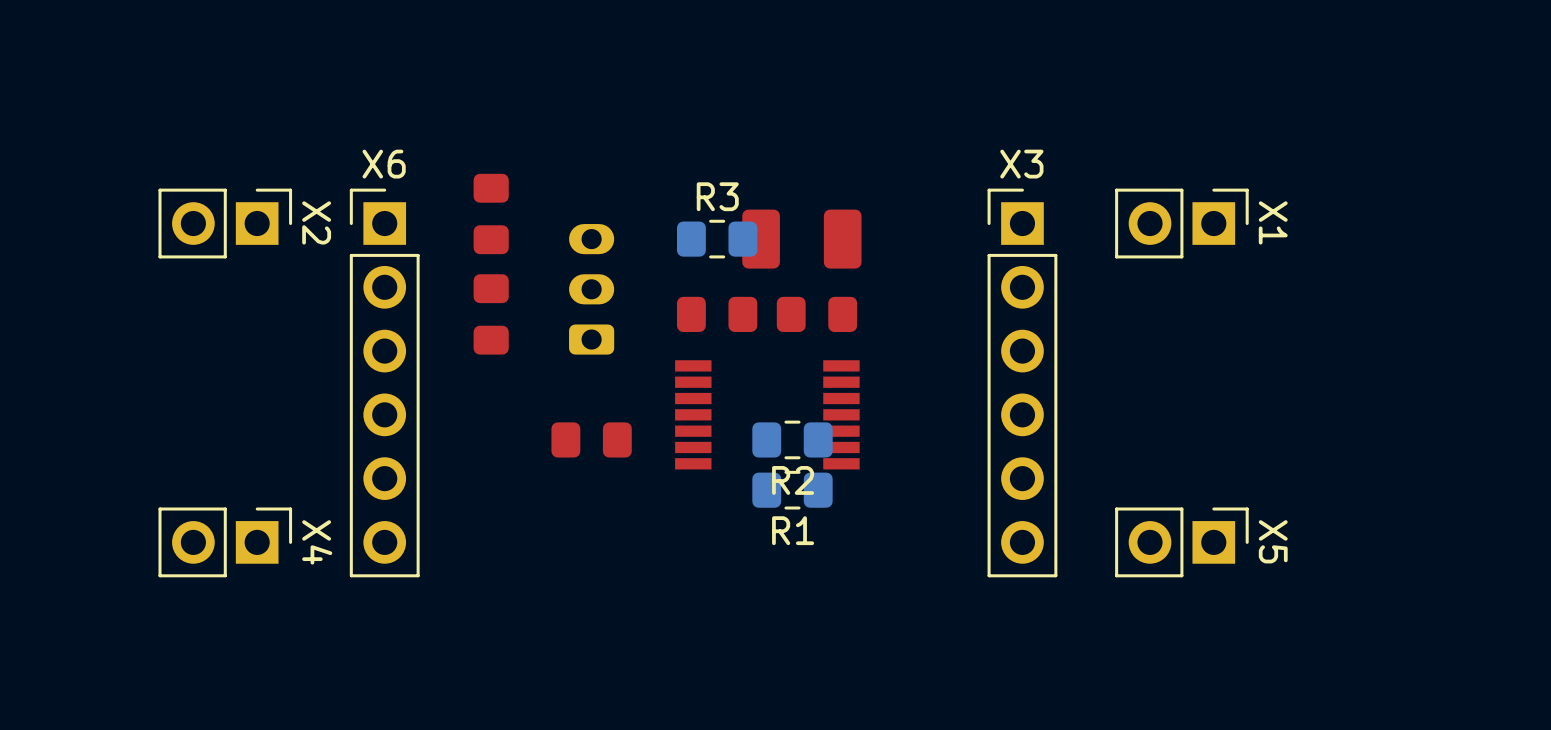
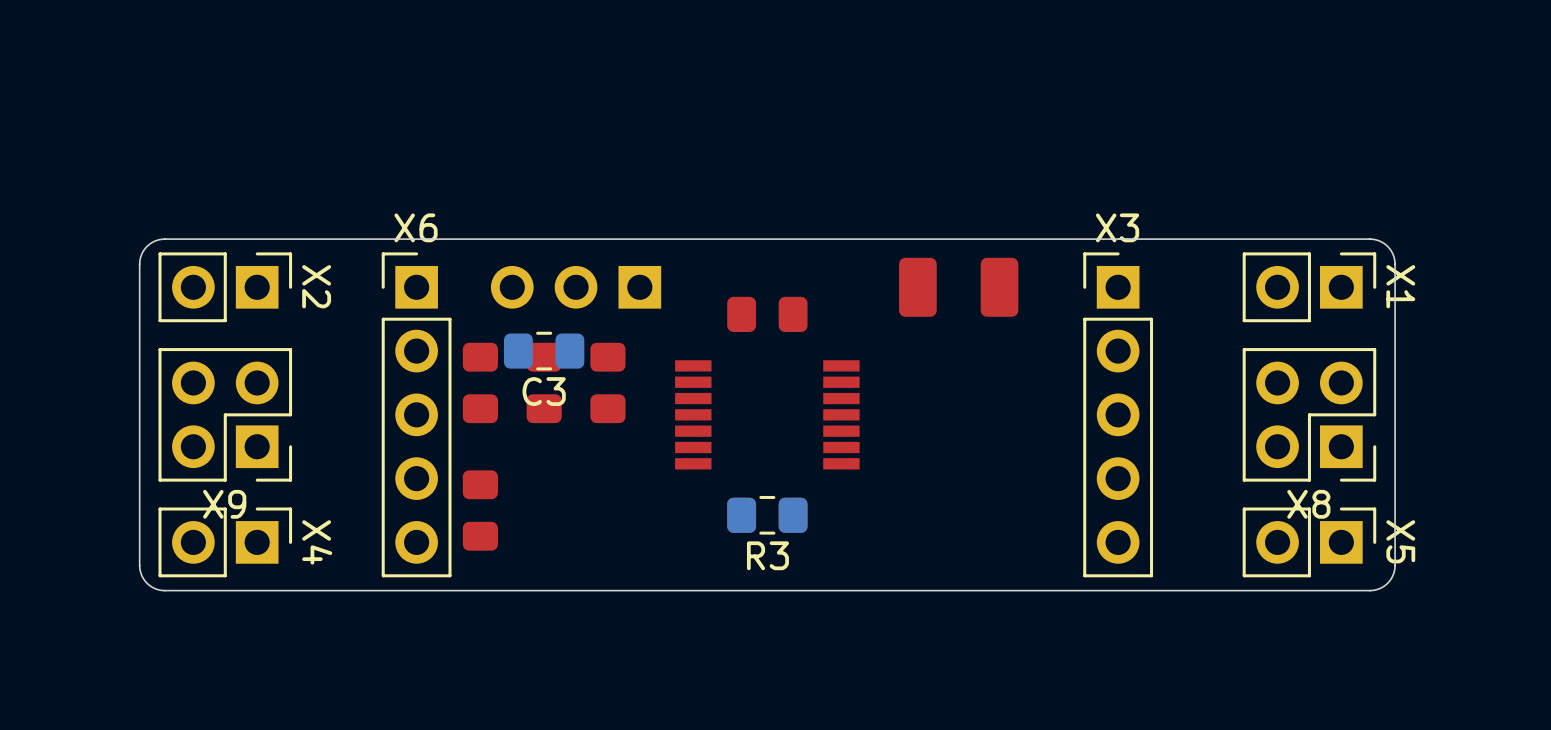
X6 footprint: [349, 188, 420, 578] -> [381, 252, 452, 578]
X3 footprint: [987, 188, 1058, 578] -> [1083, 252, 1154, 578]
R3 name position: R3 (717, 196) -> R3 (767, 555)
part: (491, 213) -> none
X2 position: (225, 223) -> (225, 287)
X1 position: (1181, 223) -> (1309, 287)
part footprint: [569, 224, 615, 355] -> [490, 265, 662, 309]
R3 position: (717, 239) -> (767, 515)
part position: (801, 239) -> (958, 287)
board edge: none -> (1369, 239) (158, 239) (144, 248) (139, 264) (140, 572) (149, 585) (164, 590) (1376, 589) (1389, 580) (1395, 565) (1395, 264) (1393, 254) (1387, 246) (1379, 241) (1369, 239)
C3 side: top (491, 314) -> bottom (544, 351)
part: (717, 314) -> none
part: none -> (767, 314)
part: (816, 314) -> none
part: none -> (544, 382)
part: none -> (607, 382)
X9: none -> (225, 414)
X8: none -> (1309, 414)
part: (591, 439) -> none
R2 side: bottom (792, 439) -> top (480, 382)
R1 side: bottom (792, 490) -> top (480, 510)
X5 position: (1181, 542) -> (1309, 542)

